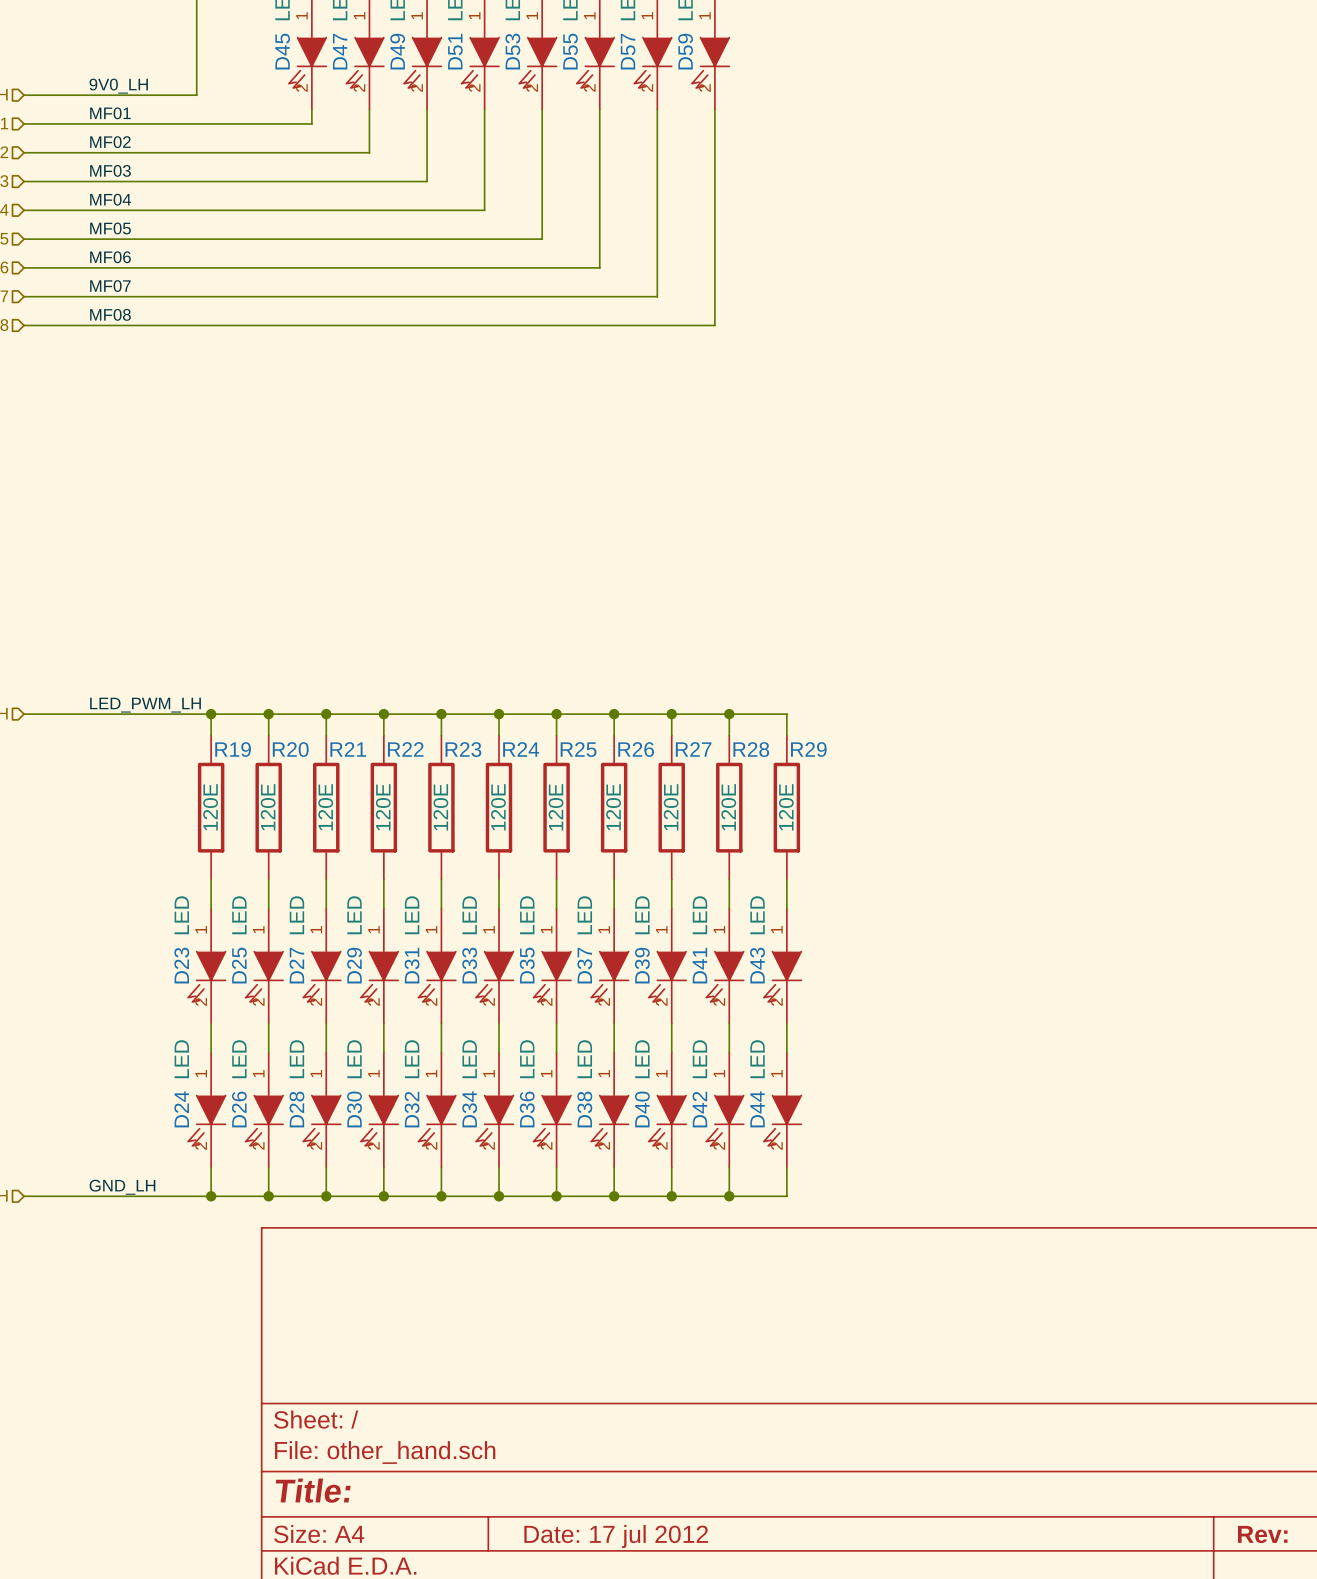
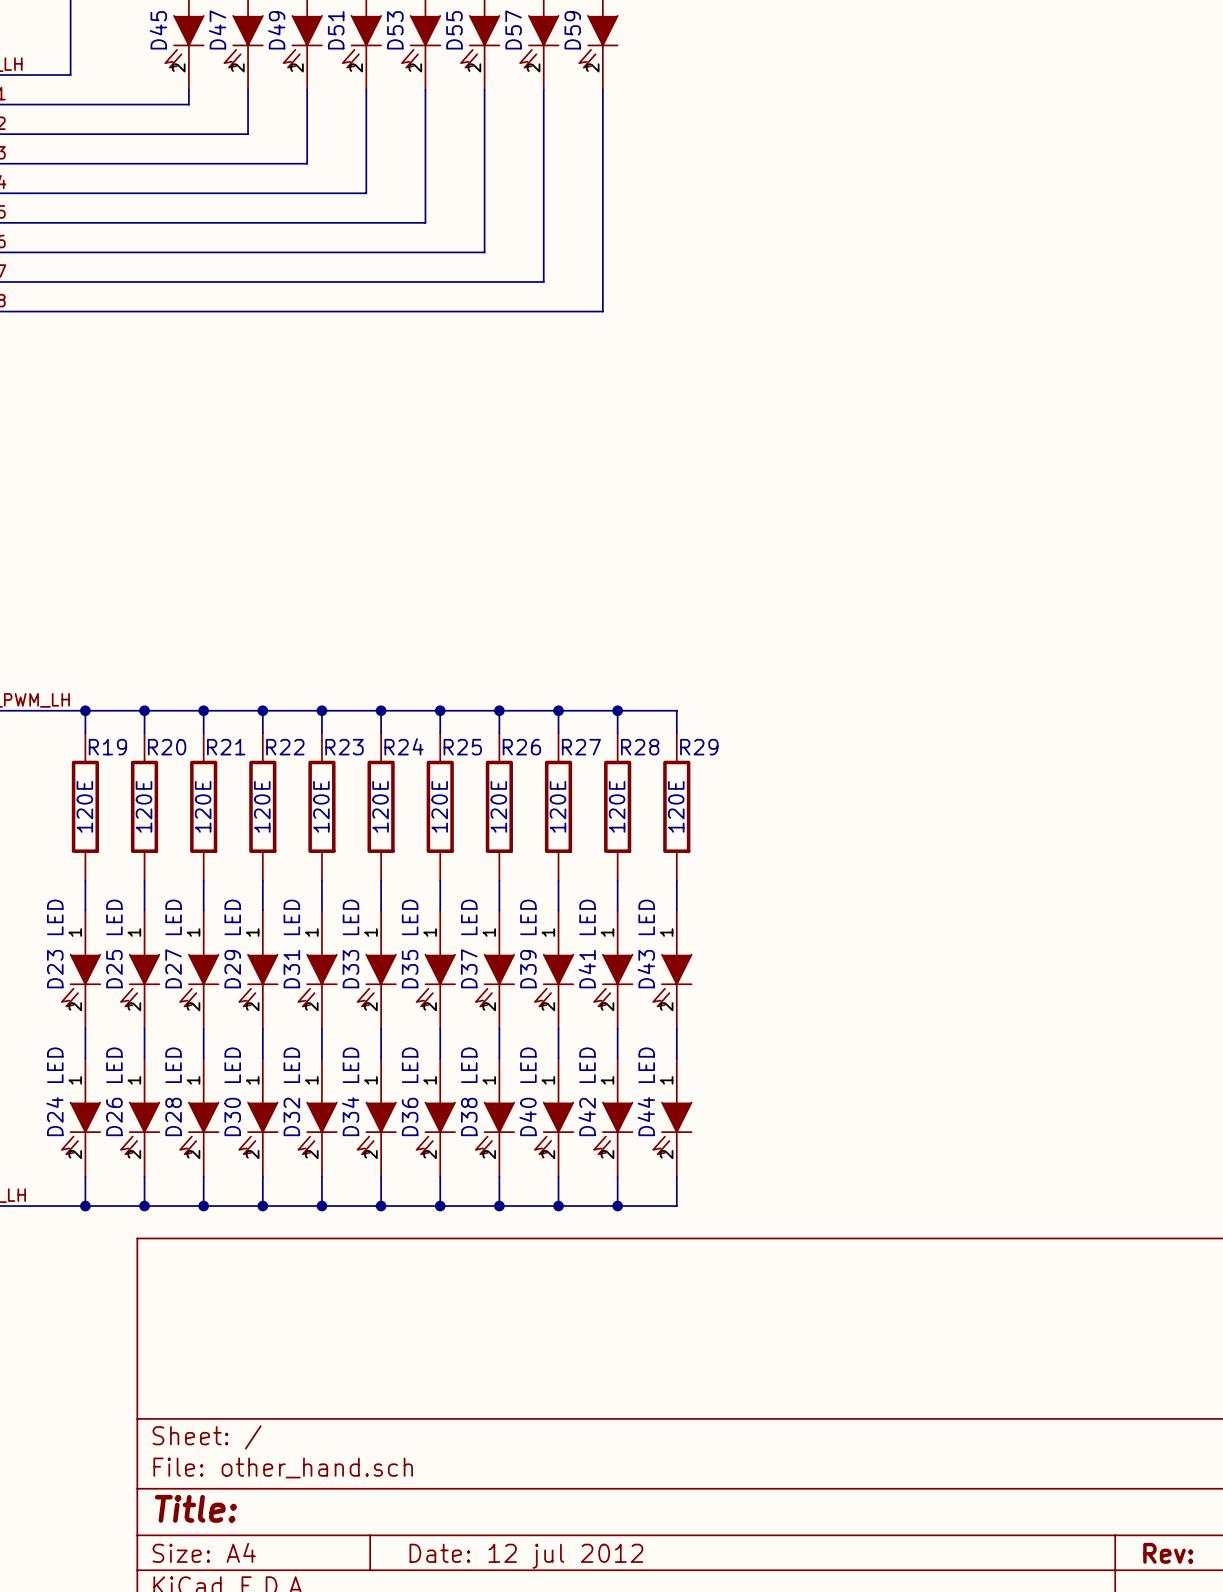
title block: Date: 17 jul 2012 (616, 1536) -> Date: 12 jul 2012 (526, 1556)

